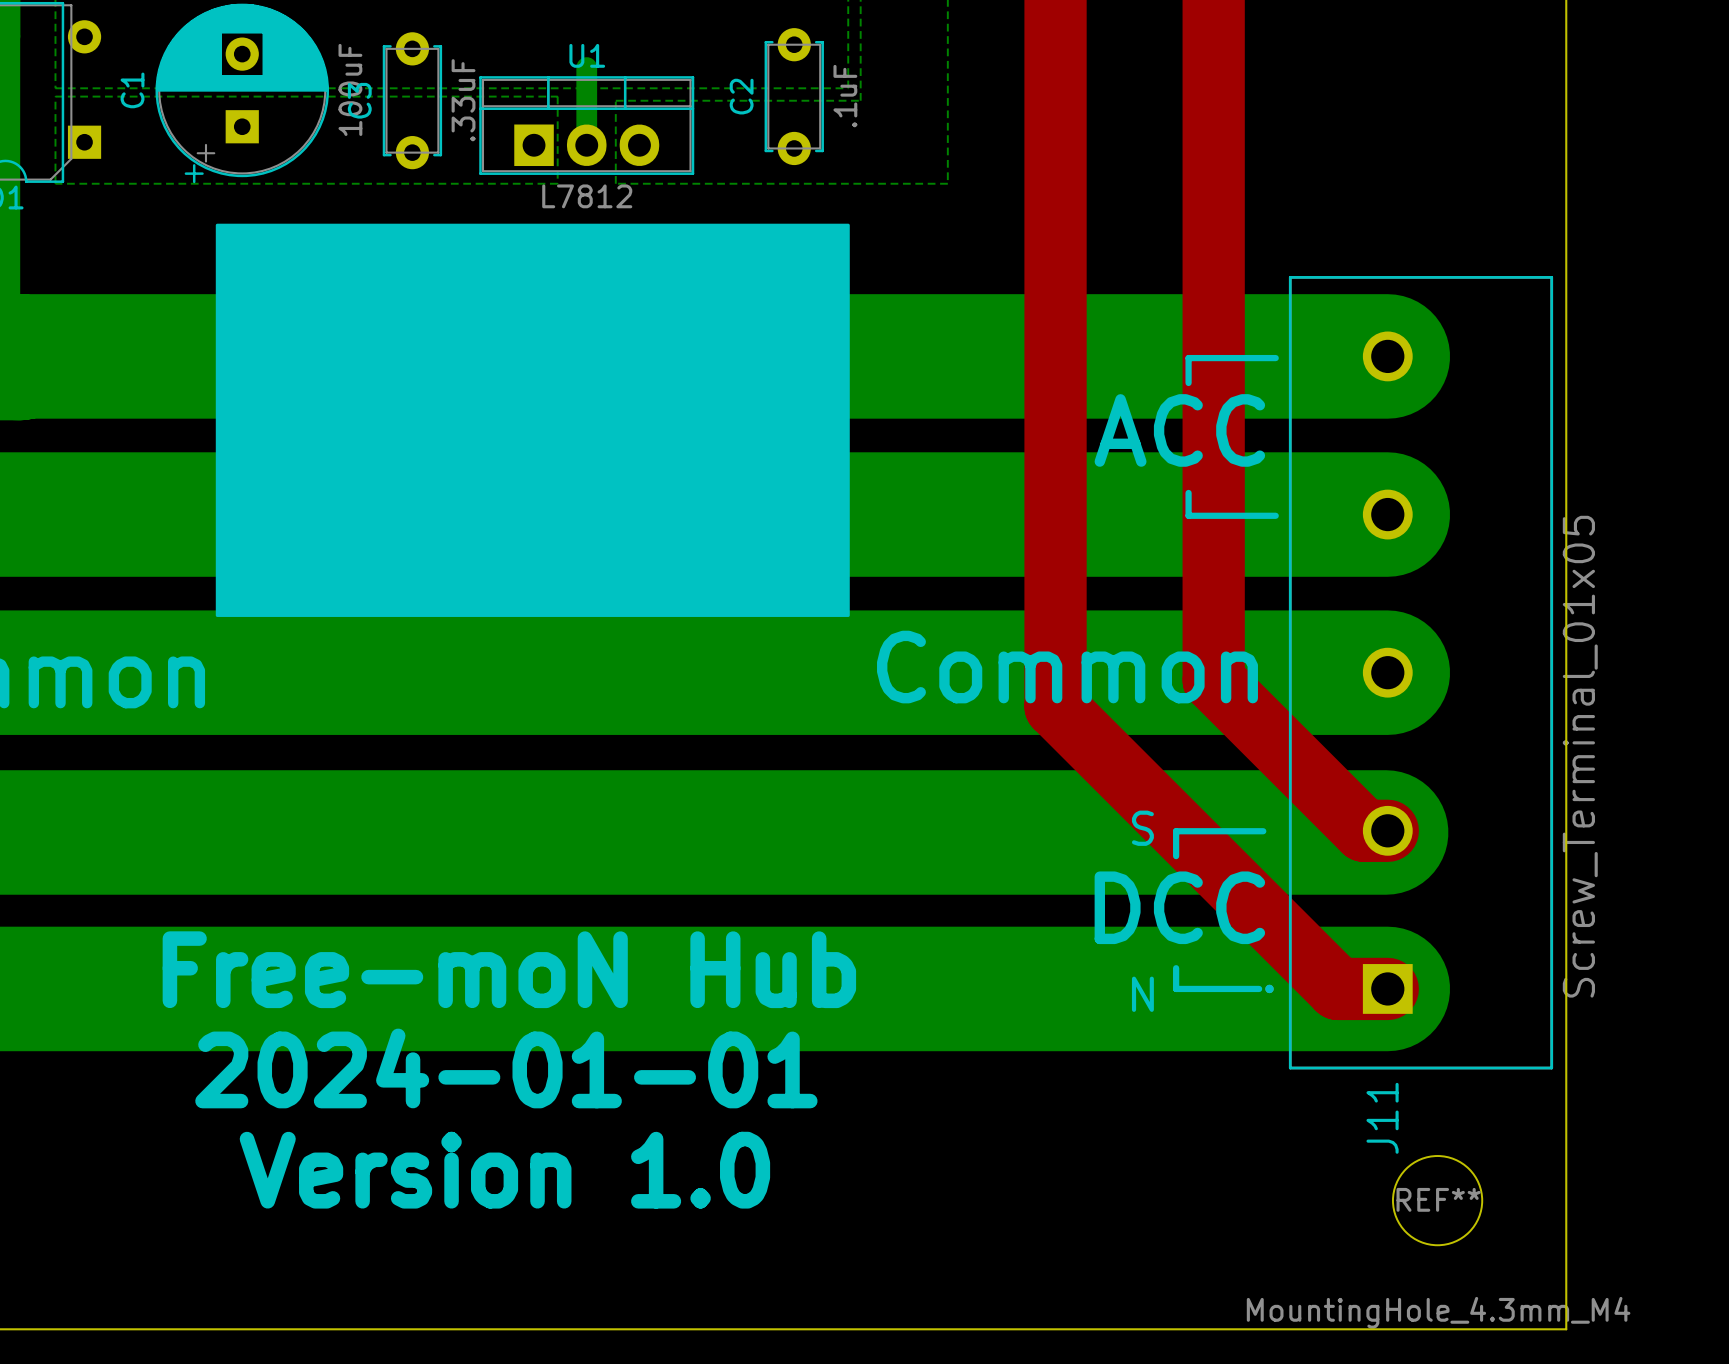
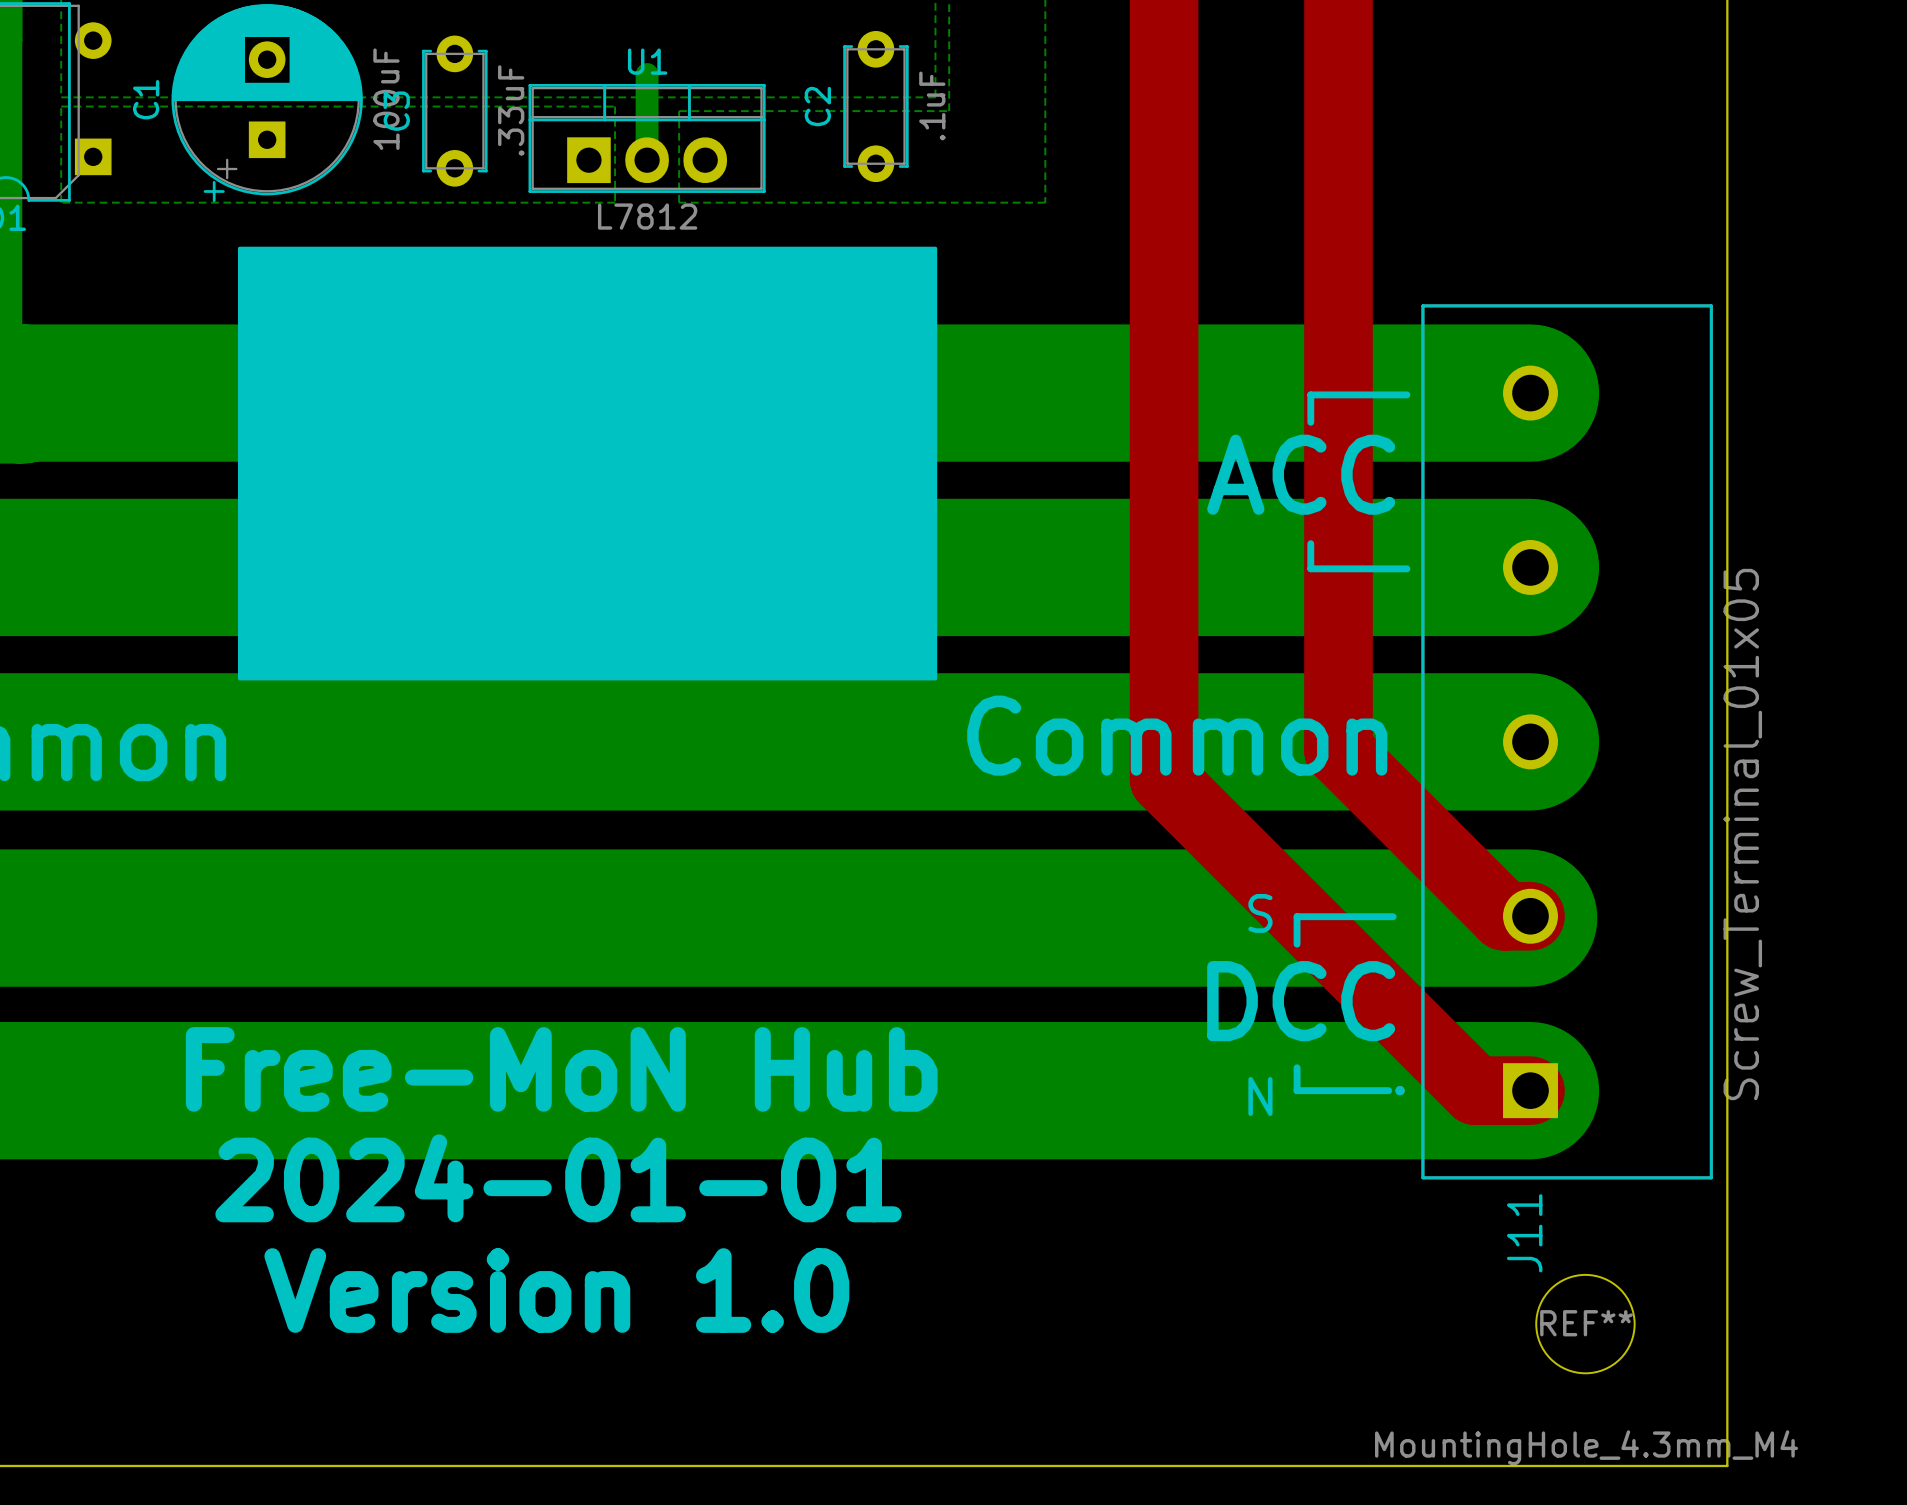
text: Free-moN Hub (509, 969) -> Free-MoN Hub (561, 1069)

